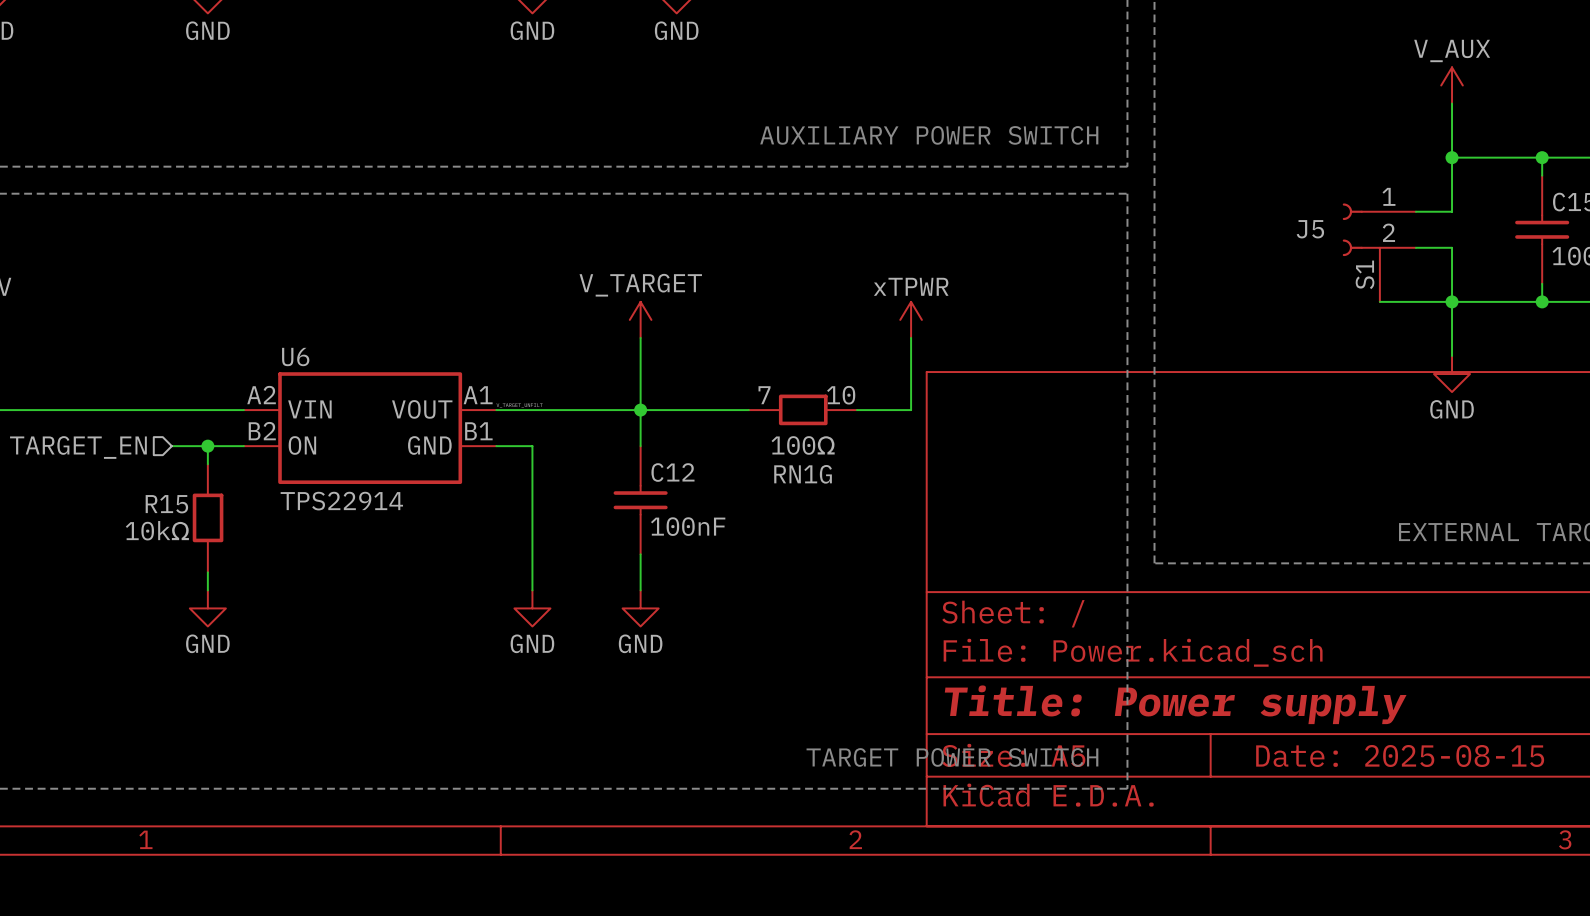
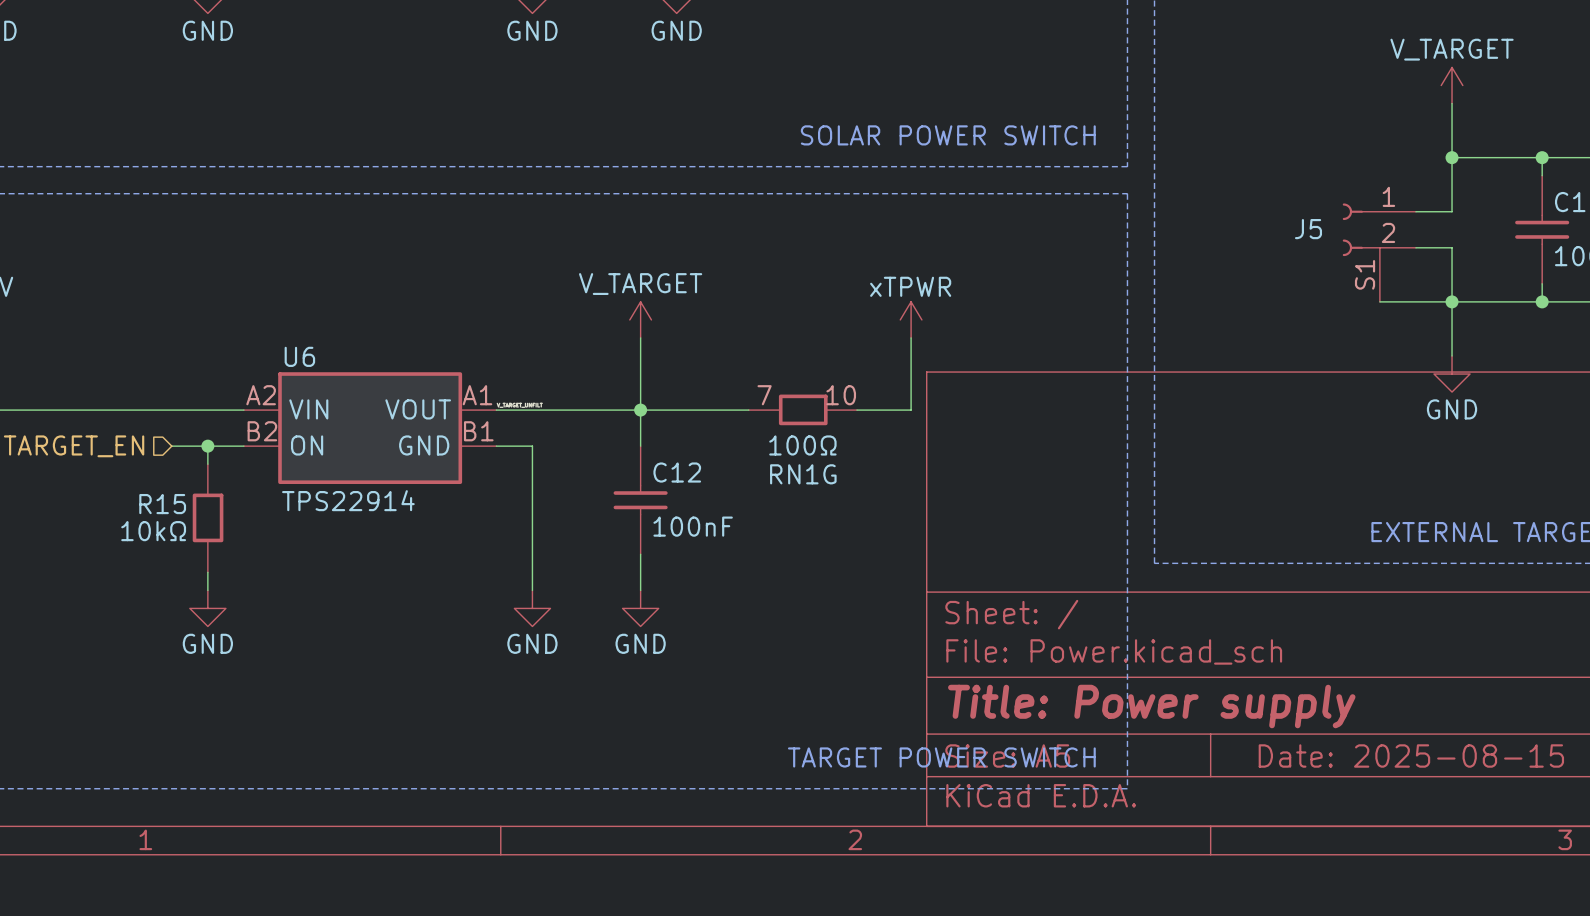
power symbol: V_AUX (1452, 85) -> V_TARGET (1452, 85)
text: AUXILIARY POWER SWITCH (929, 135) -> SOLAR POWER SWITCH (948, 135)

